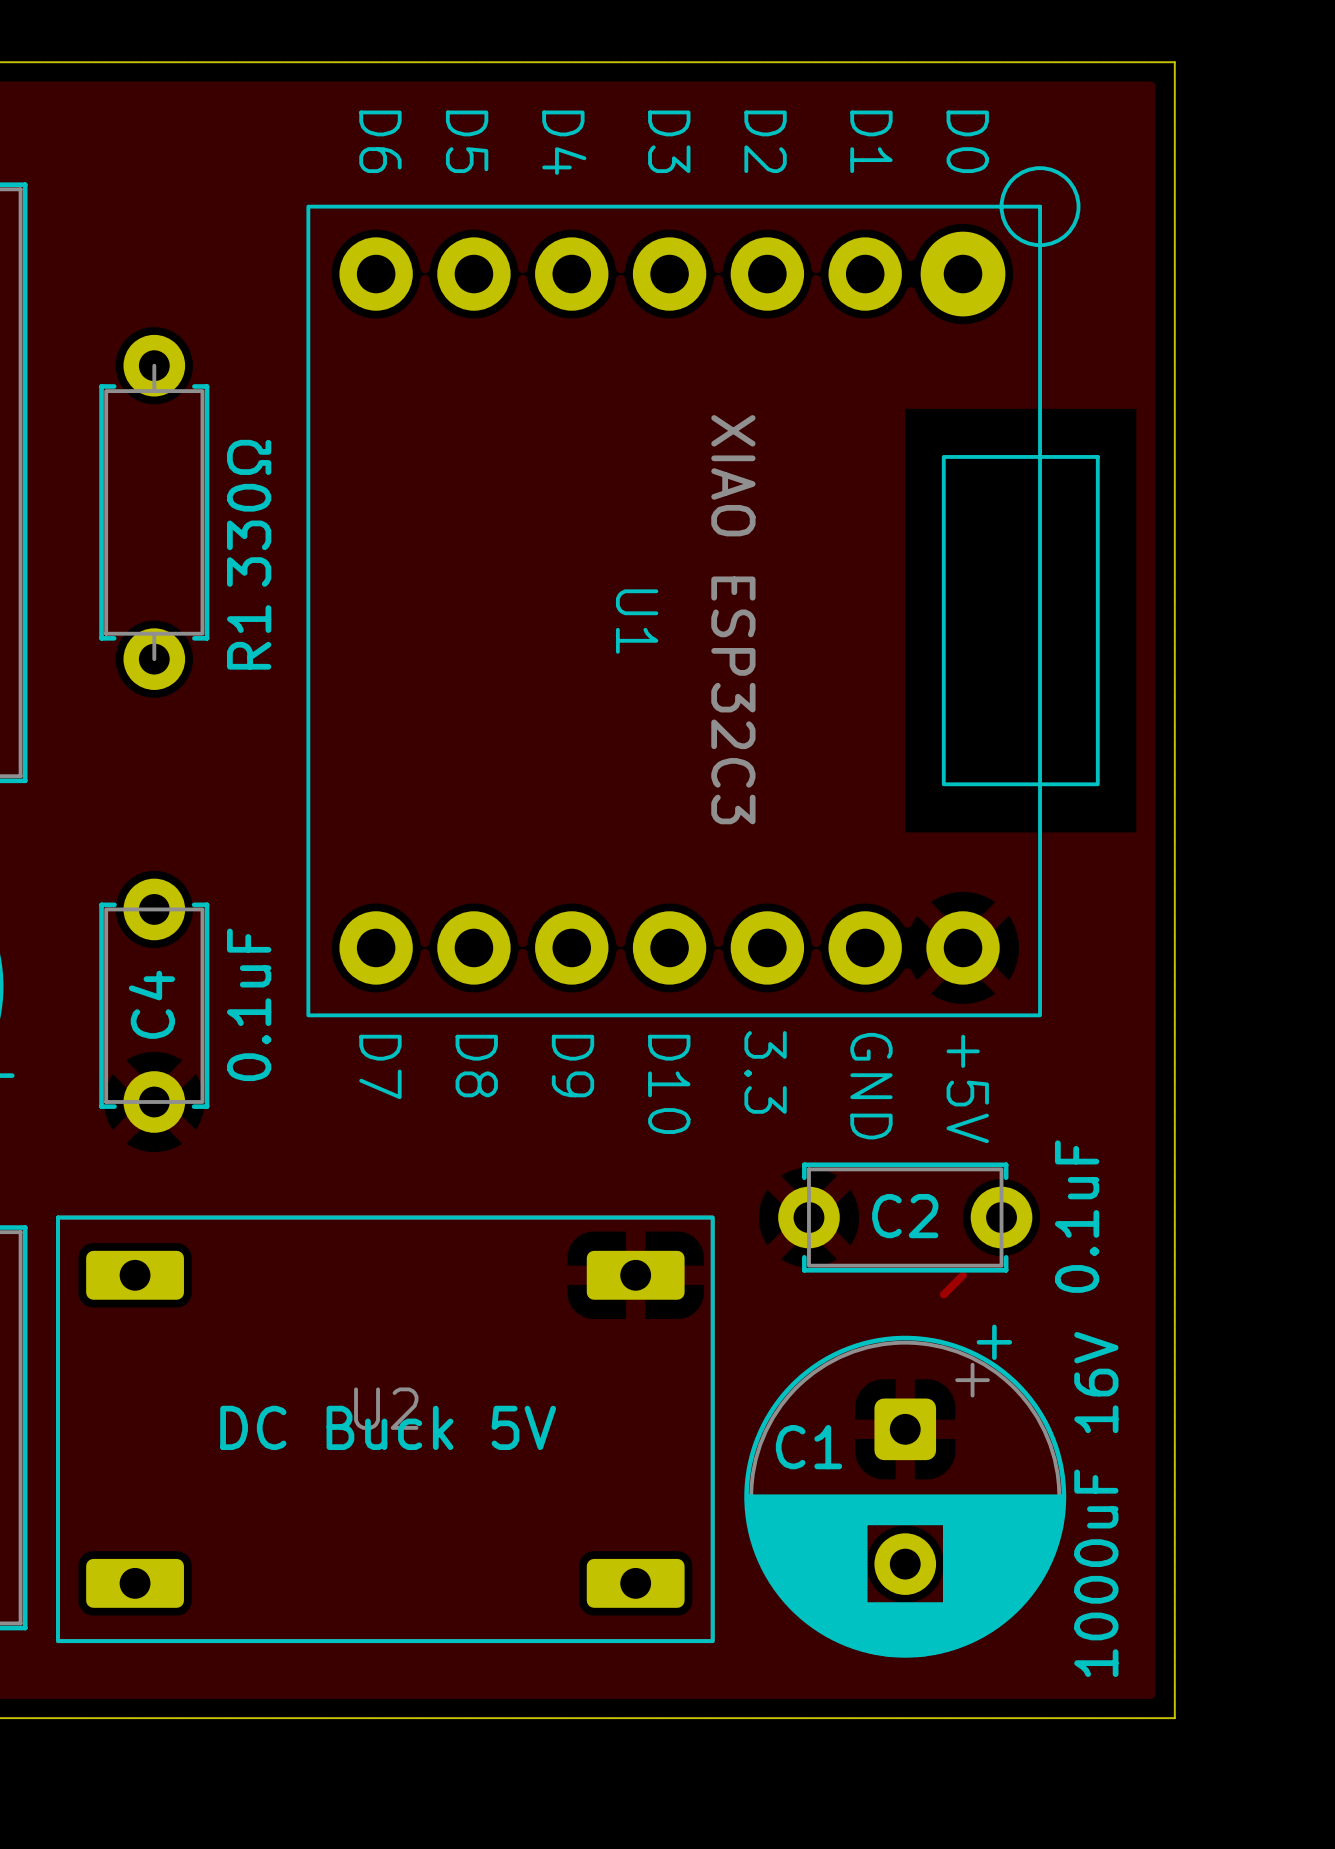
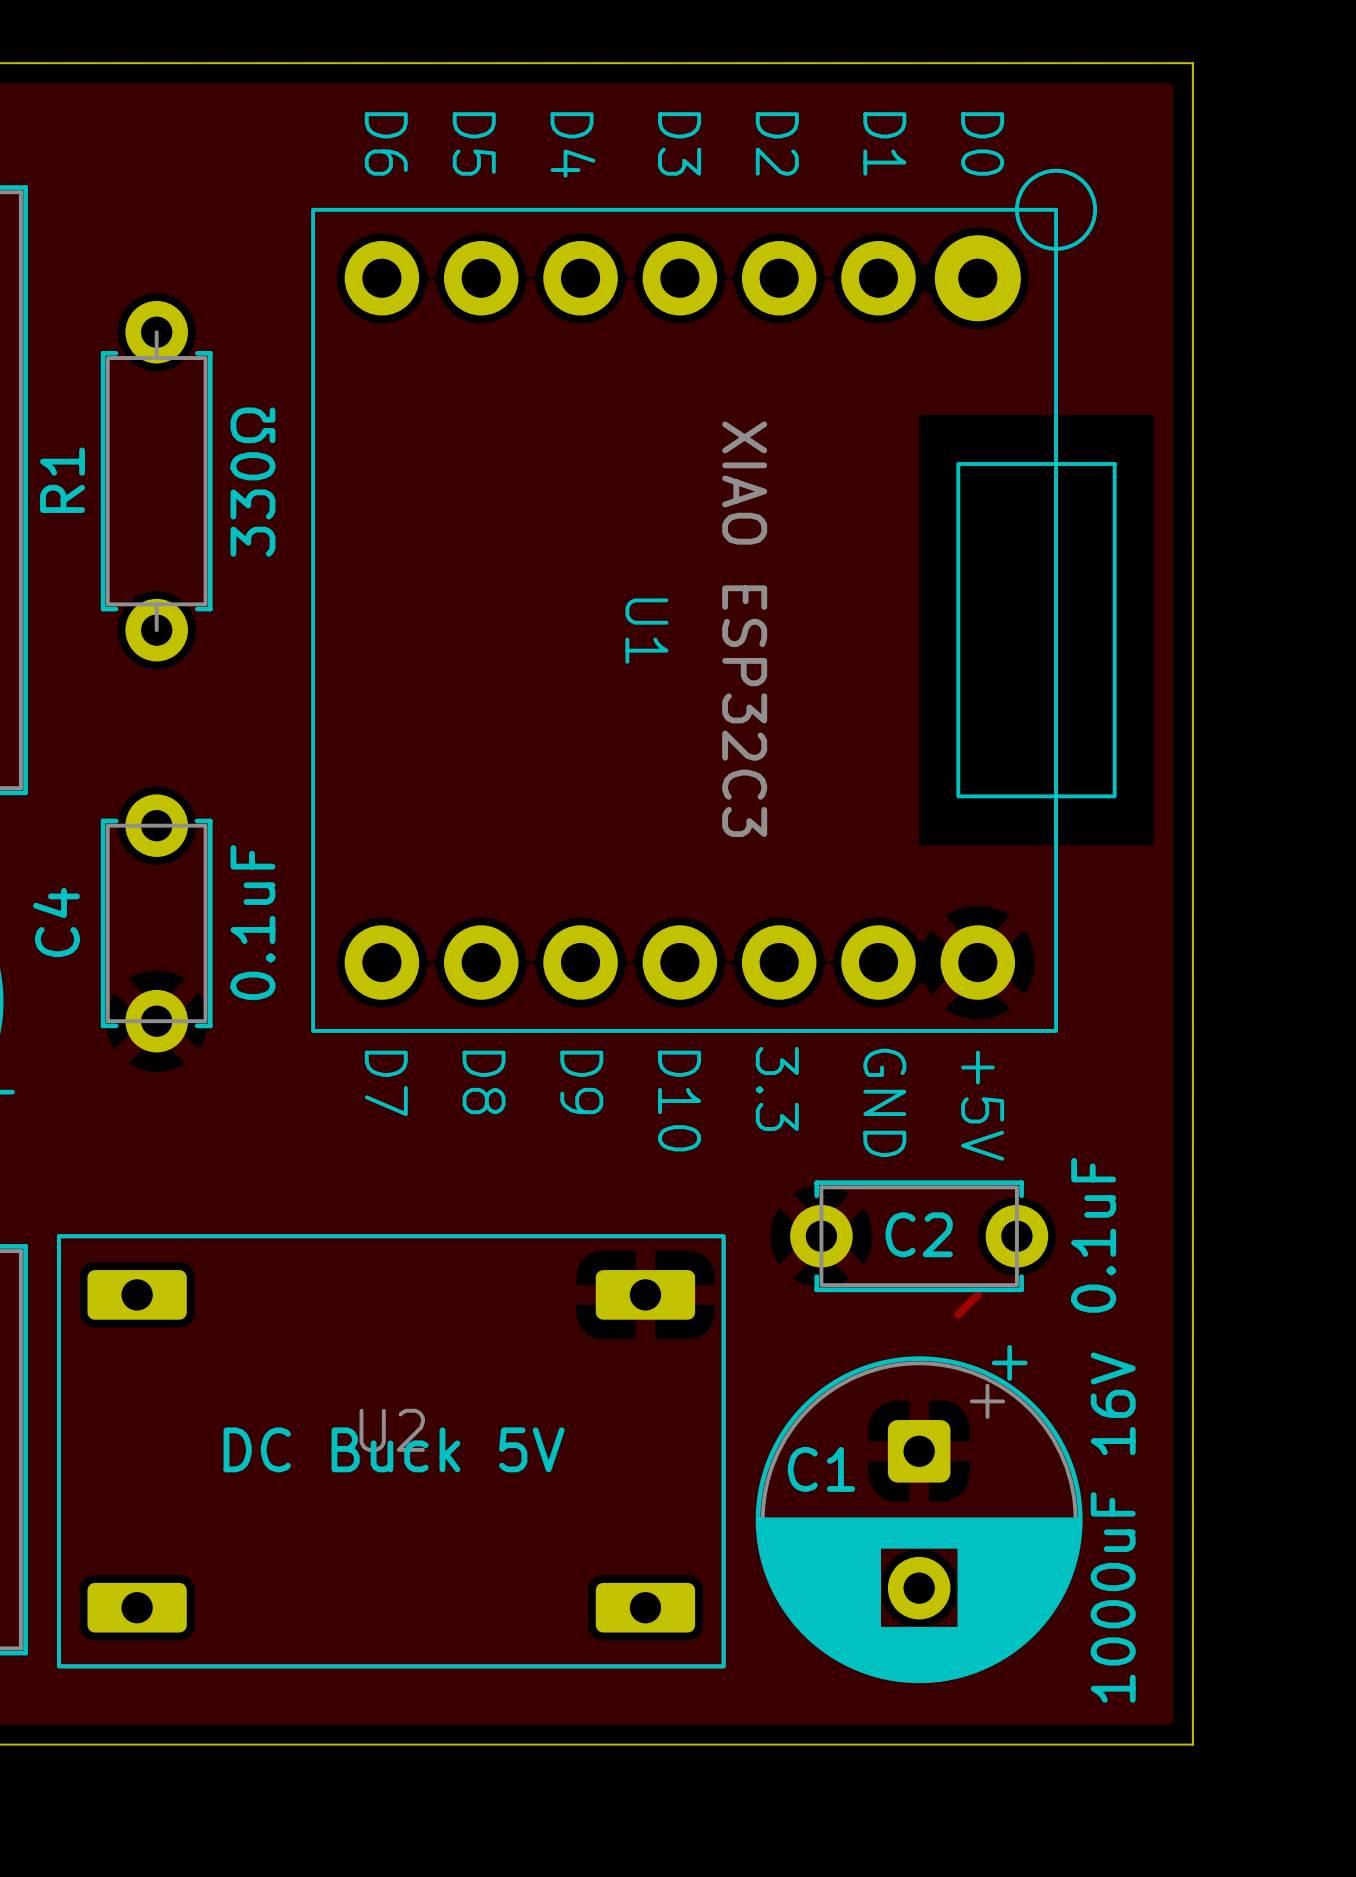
R1 position: (154, 512) -> (156, 481)
R1 name position: R1 (249, 637) -> R1 (62, 480)
C4 name position: C4 (151, 1004) -> C4 (56, 922)
C4 position: (154, 1005) -> (156, 923)

